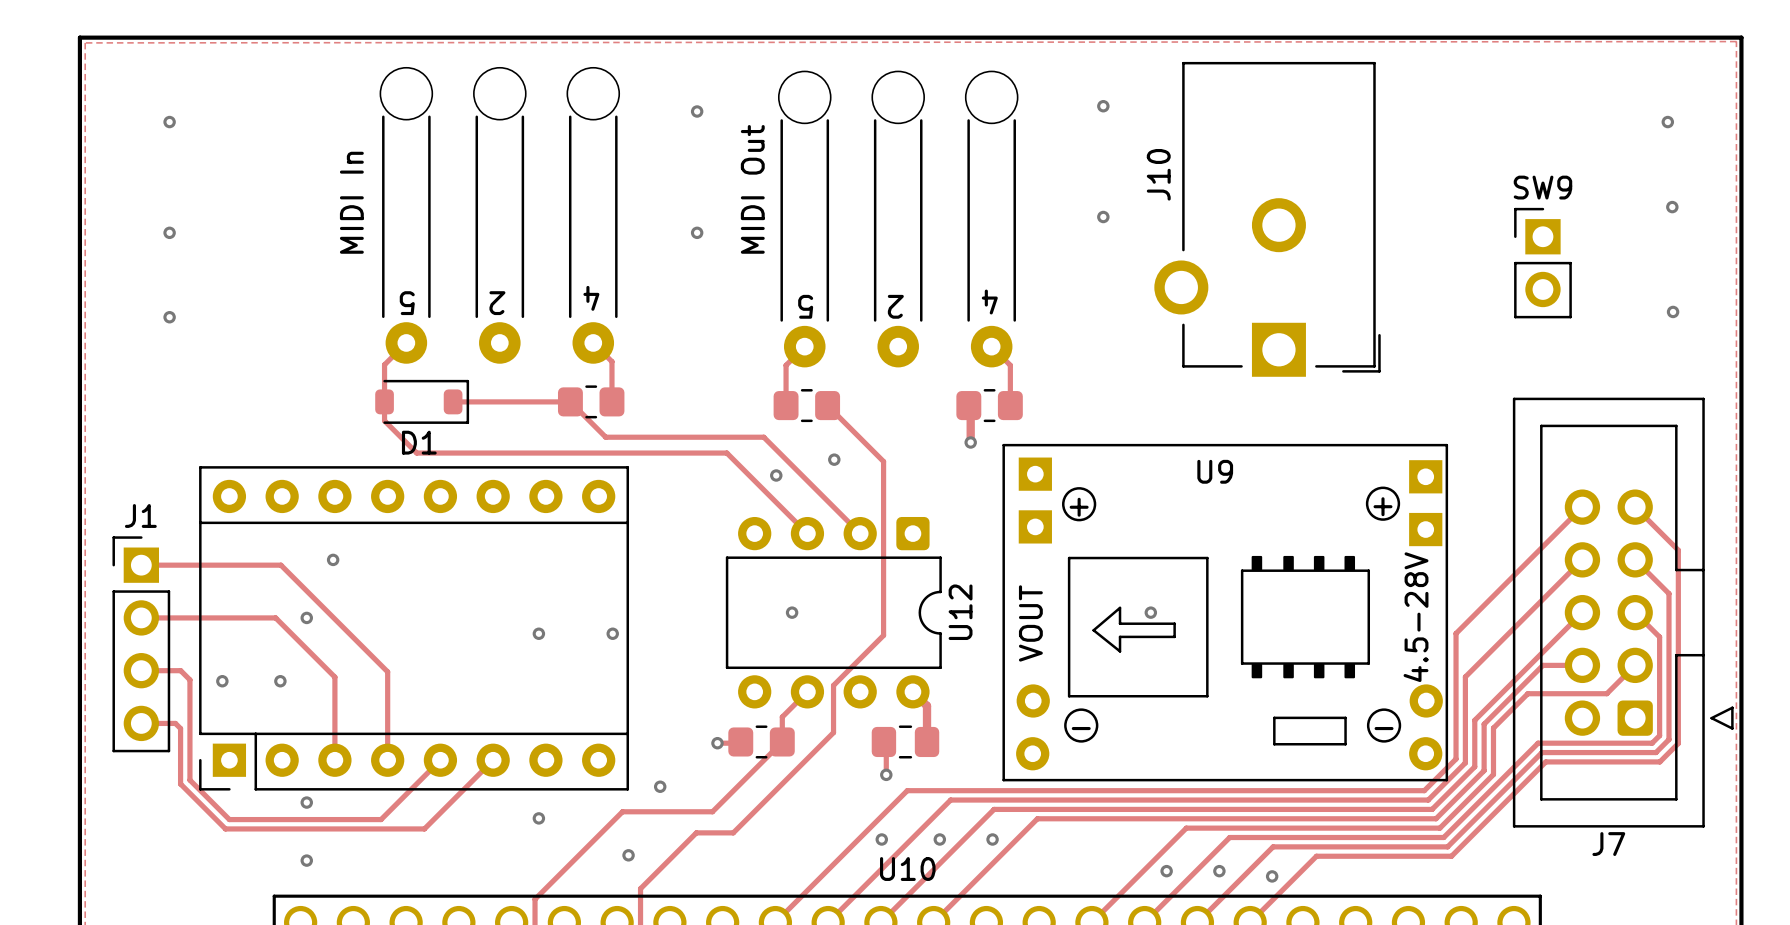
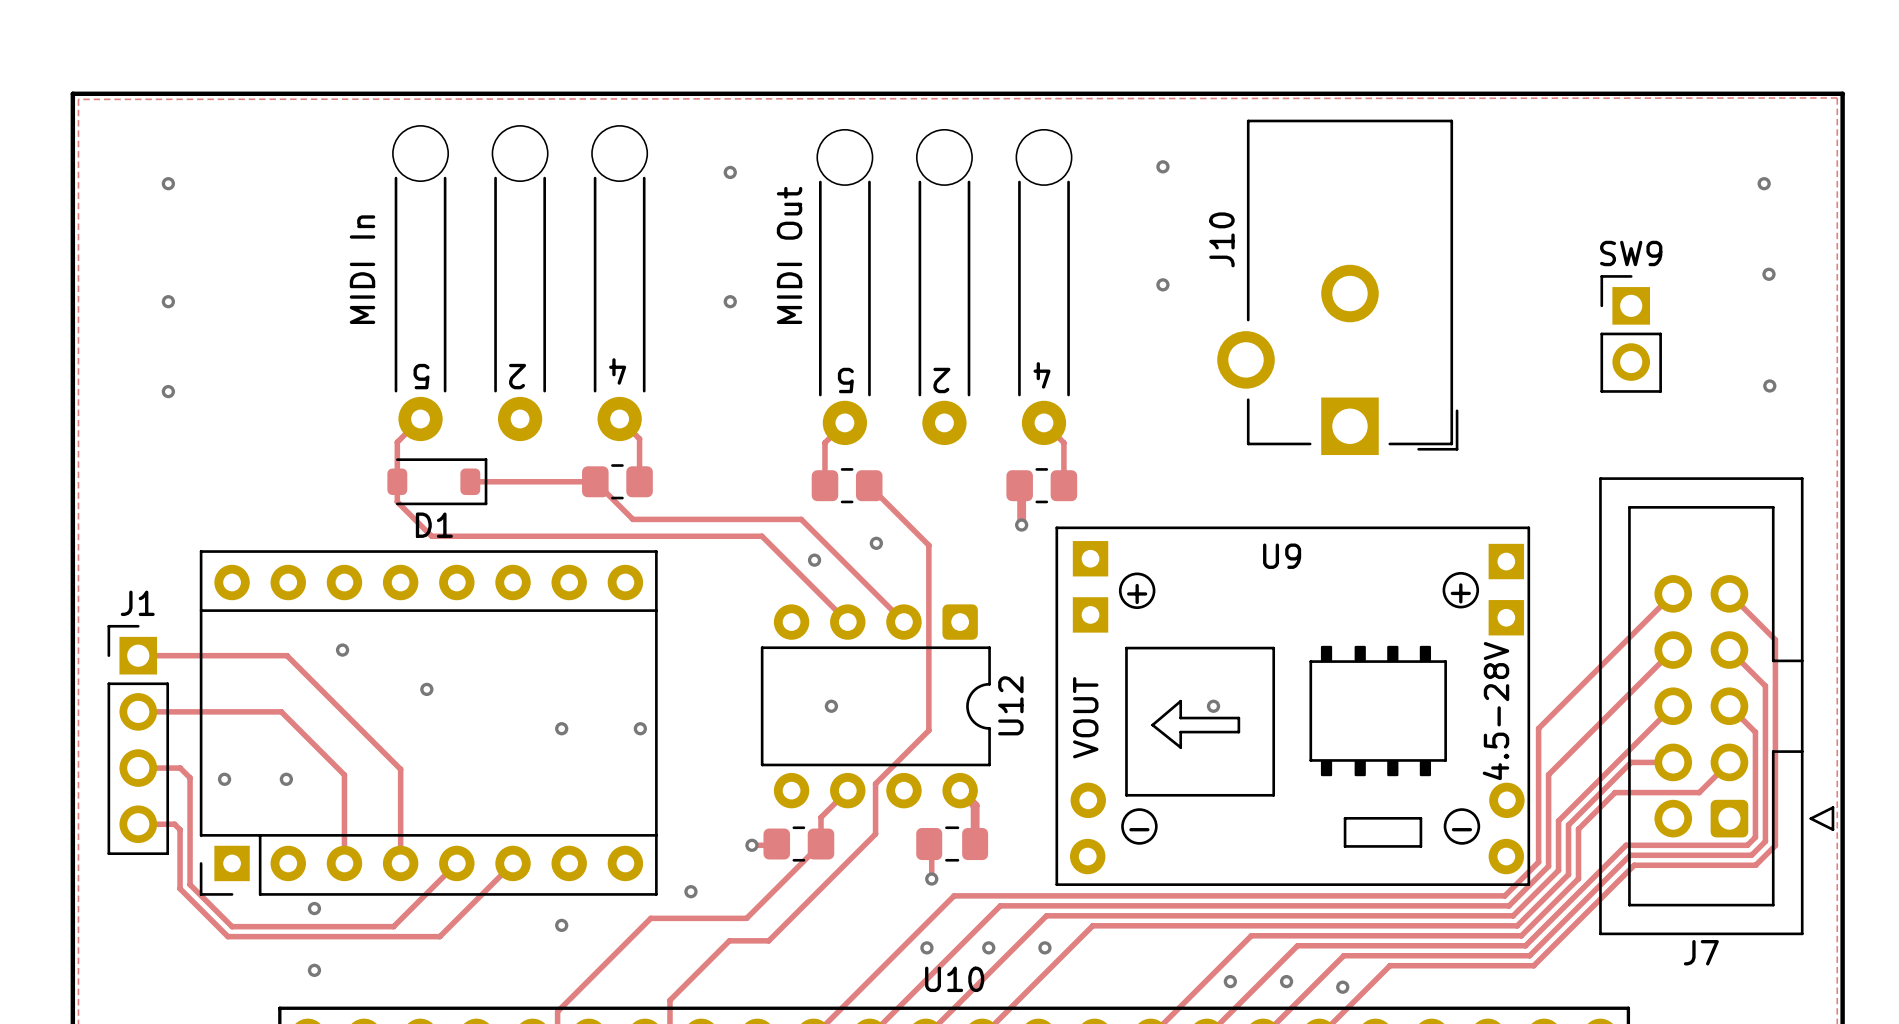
via position: (306, 617) -> (426, 689)
via: (628, 855) -> none

